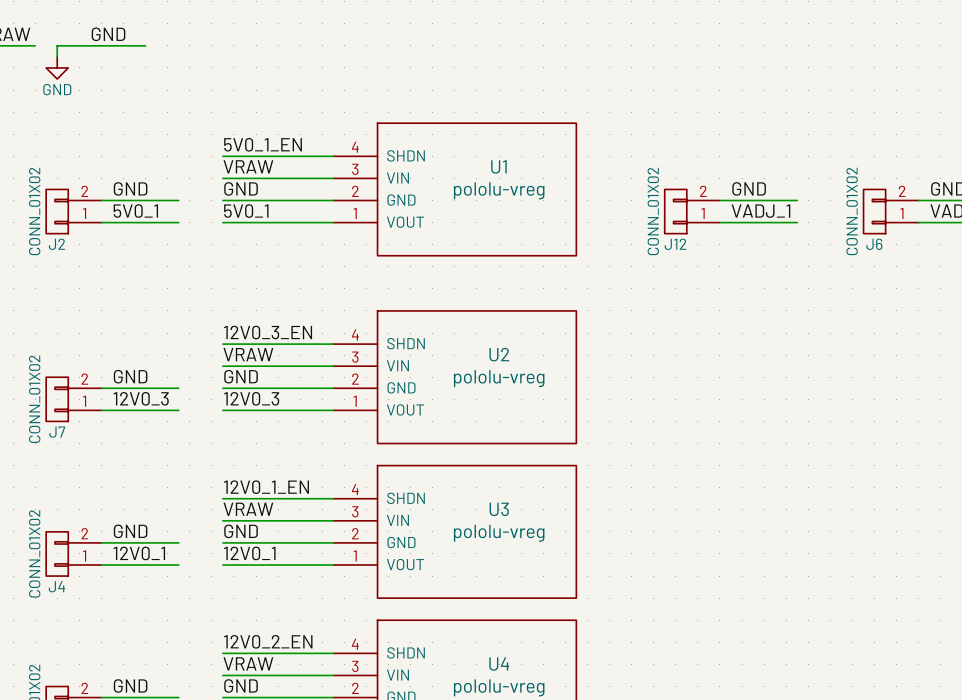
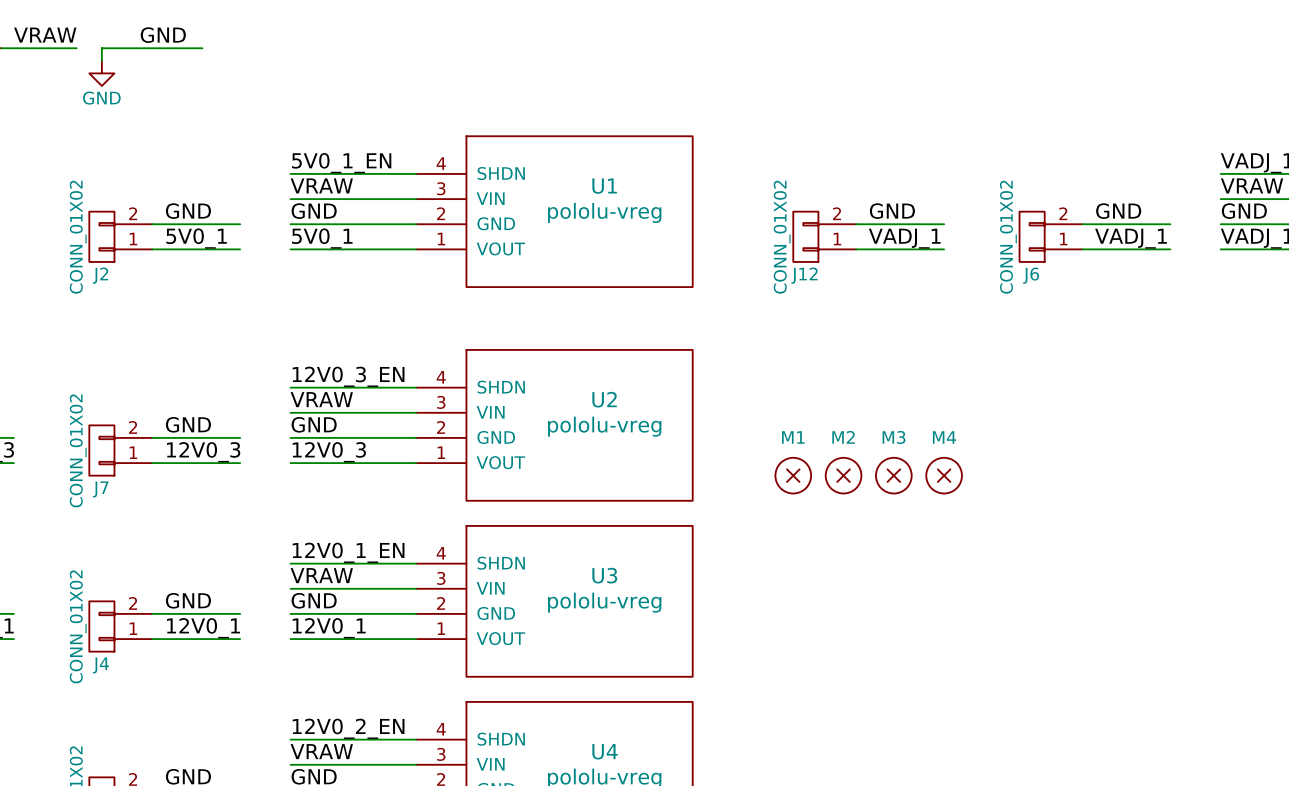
M1: none -> (793, 475)
M2: none -> (843, 475)
M3: none -> (893, 475)
M4: none -> (944, 475)

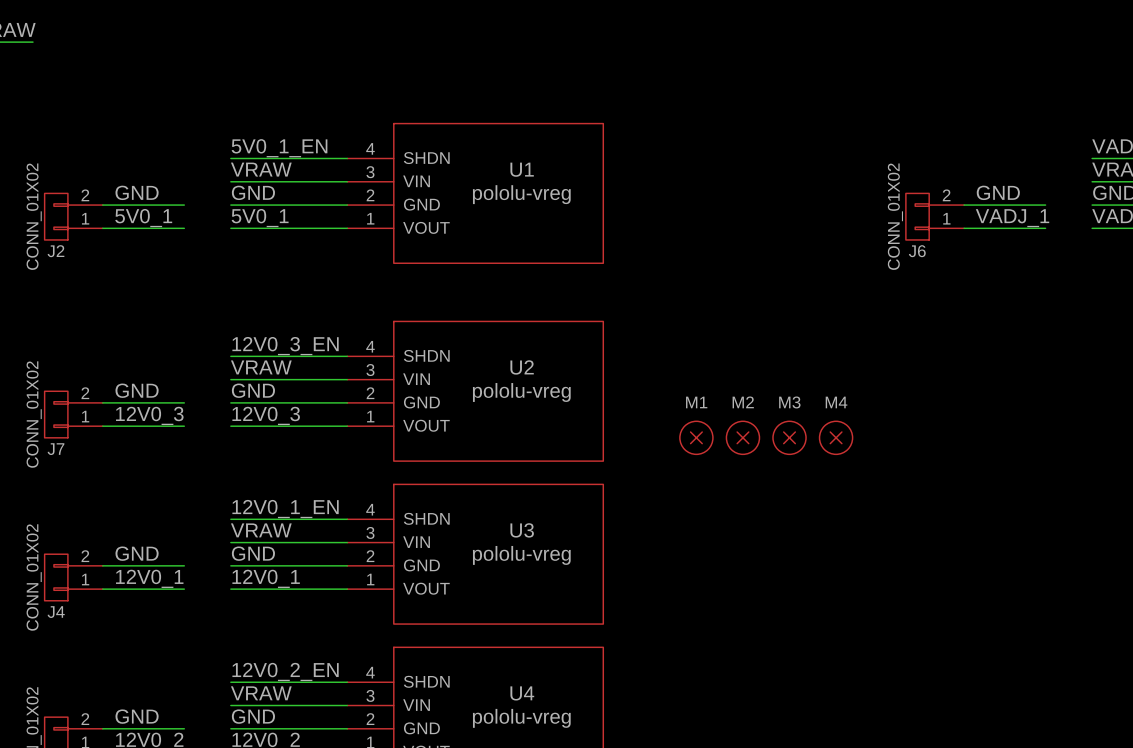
label: GND (163, 35) -> none
wire: (202, 48) (101, 48) (101, 60) -> none
power symbol: GND (101, 73) -> none
label: GND (892, 211) -> none
wire: (856, 224) (944, 224) -> none
J12: CONN_01X02 (824, 236) -> none
label: VADJ_1 (904, 238) -> none
wire: (856, 249) (944, 249) -> none

